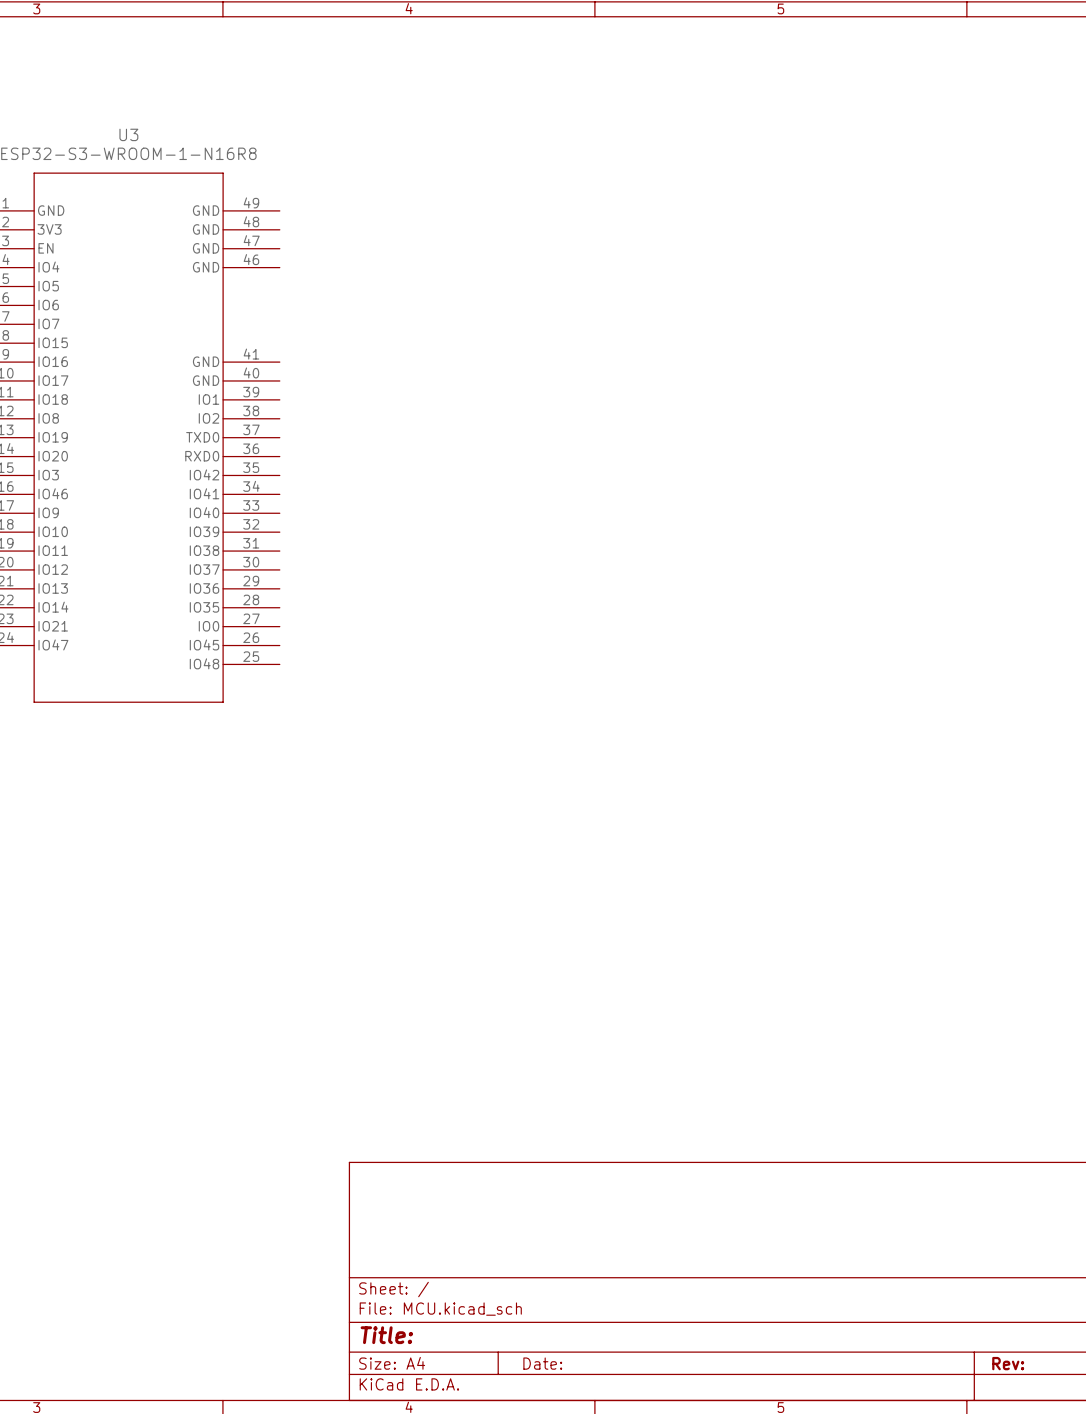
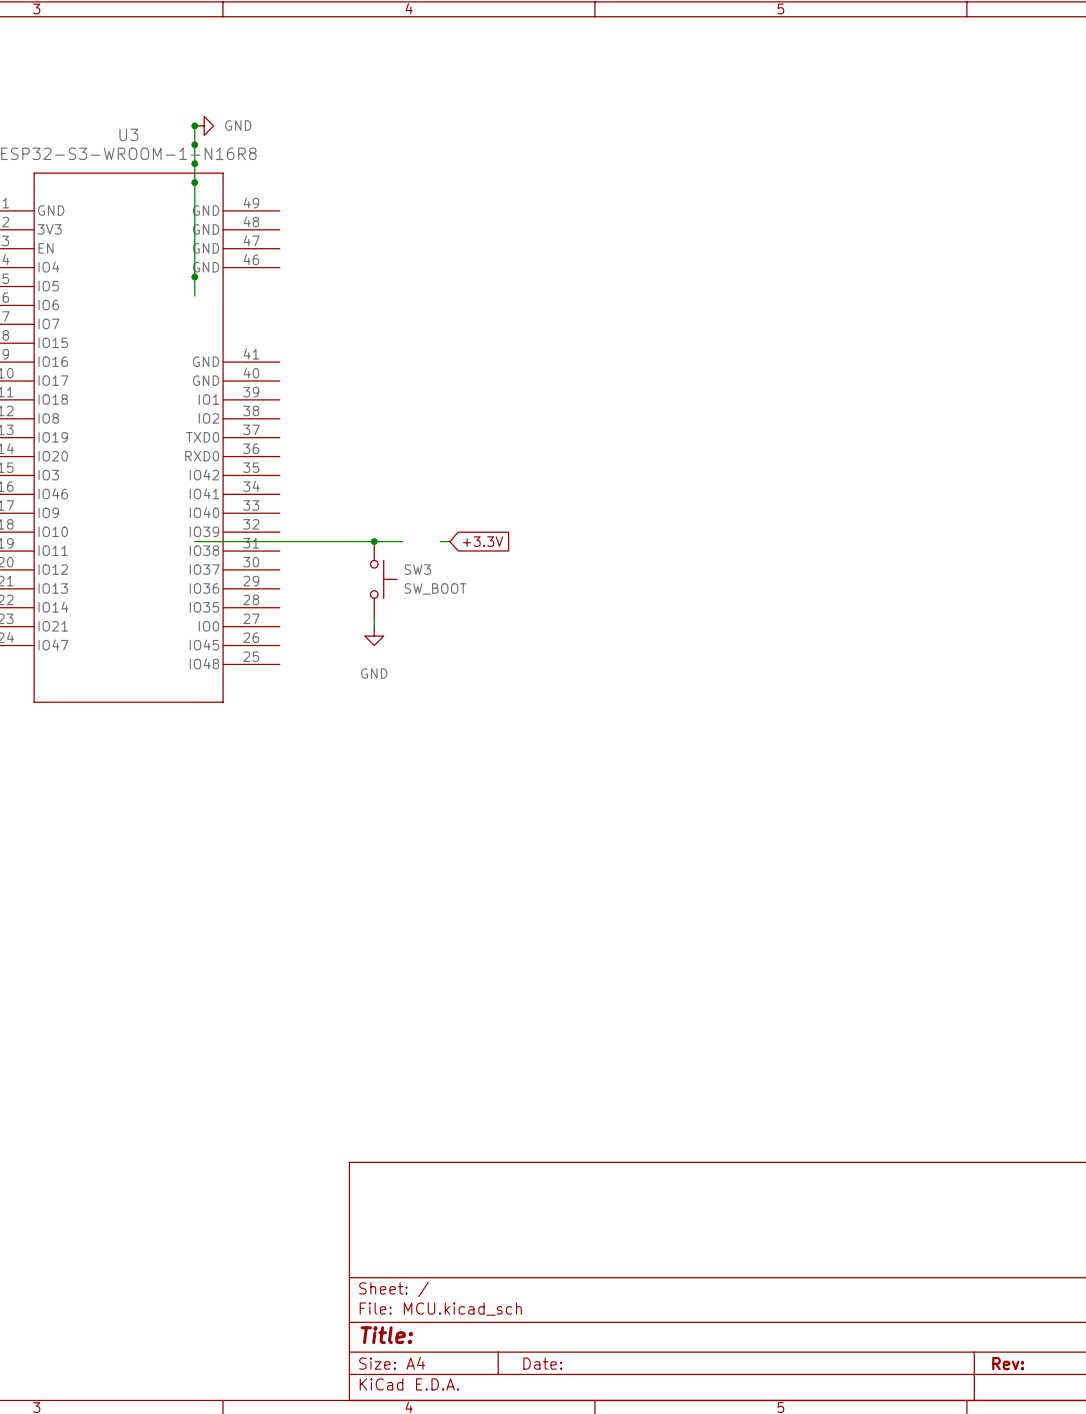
wire: none -> (194, 125) (194, 295)
junction: none -> (194, 125)
power symbol: none -> GND (204, 125)
junction: none -> (194, 144)
junction: none -> (194, 163)
junction: none -> (194, 182)
junction: none -> (194, 277)
wire: none -> (194, 541) (402, 541)
junction: none -> (374, 541)
wire: none -> (440, 541) (449, 541)
global label: none -> +3.3V (483, 541)
SW3: none -> SW_BOOT (383, 579)
wire: none -> (374, 617) (374, 626)
power symbol: none -> GND (374, 636)

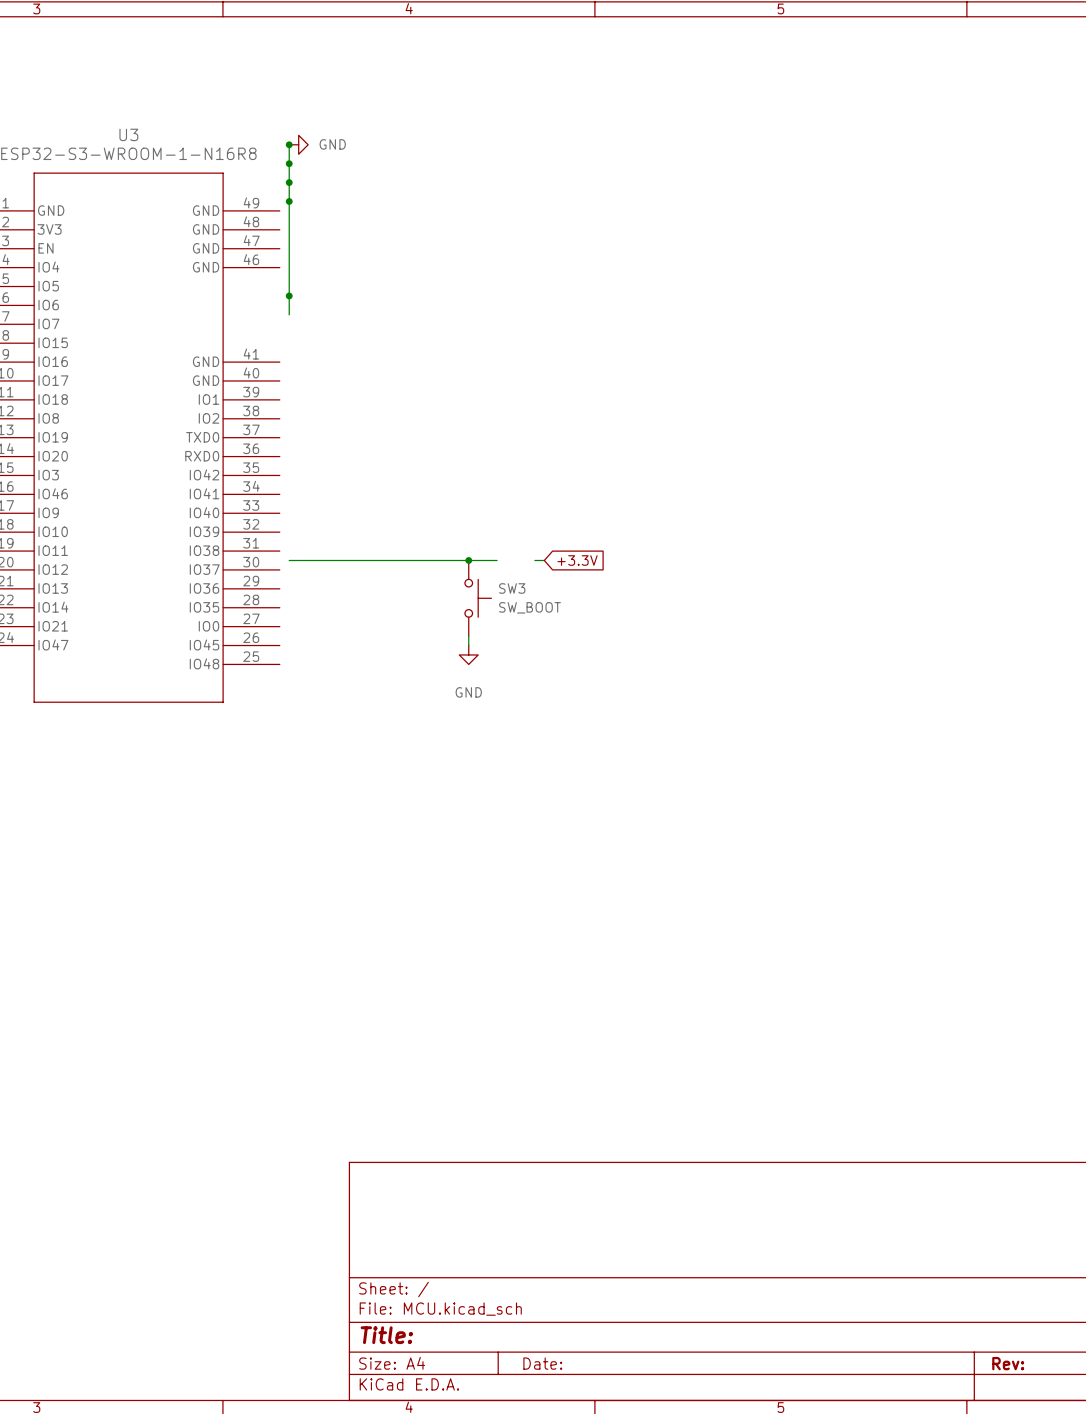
wire: (194, 125) (194, 295) -> (289, 144) (289, 314)
junction: (194, 125) -> none
power symbol position: GND (204, 125) -> GND (298, 144)
junction: (194, 144) -> none
junction: none -> (289, 144)
junction: (194, 163) -> none
junction: none -> (289, 163)
junction: (194, 182) -> none
junction: none -> (289, 182)
junction: none -> (289, 201)
junction: (194, 277) -> none
junction: none -> (289, 295)
wire: (194, 541) (402, 541) -> (289, 560) (497, 560)
junction: (374, 541) -> none
wire: (440, 541) (449, 541) -> (534, 560) (544, 560)
global label position: +3.3V (483, 541) -> +3.3V (577, 560)
junction: none -> (468, 560)
SW3 position: (383, 579) -> (478, 598)
wire: (374, 617) (374, 626) -> (468, 636) (468, 645)
power symbol position: GND (374, 636) -> GND (468, 654)

